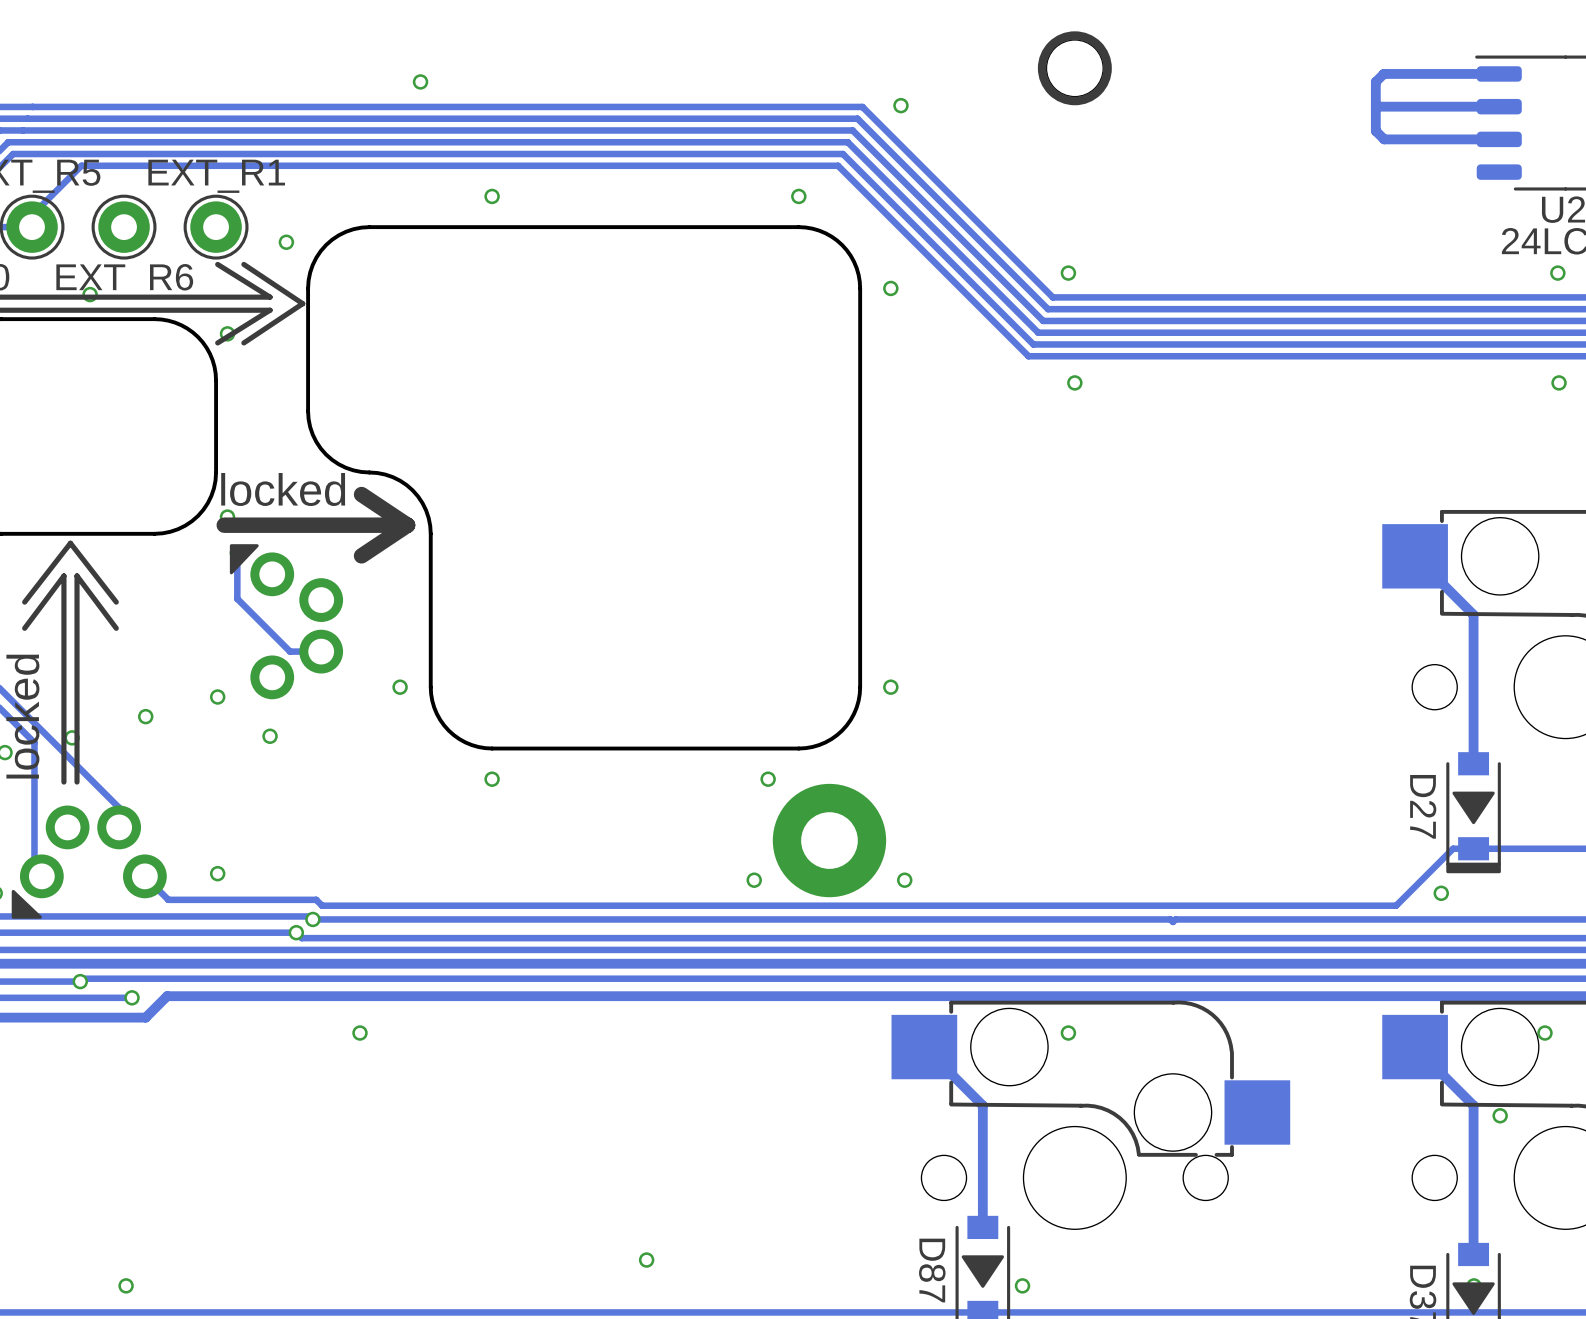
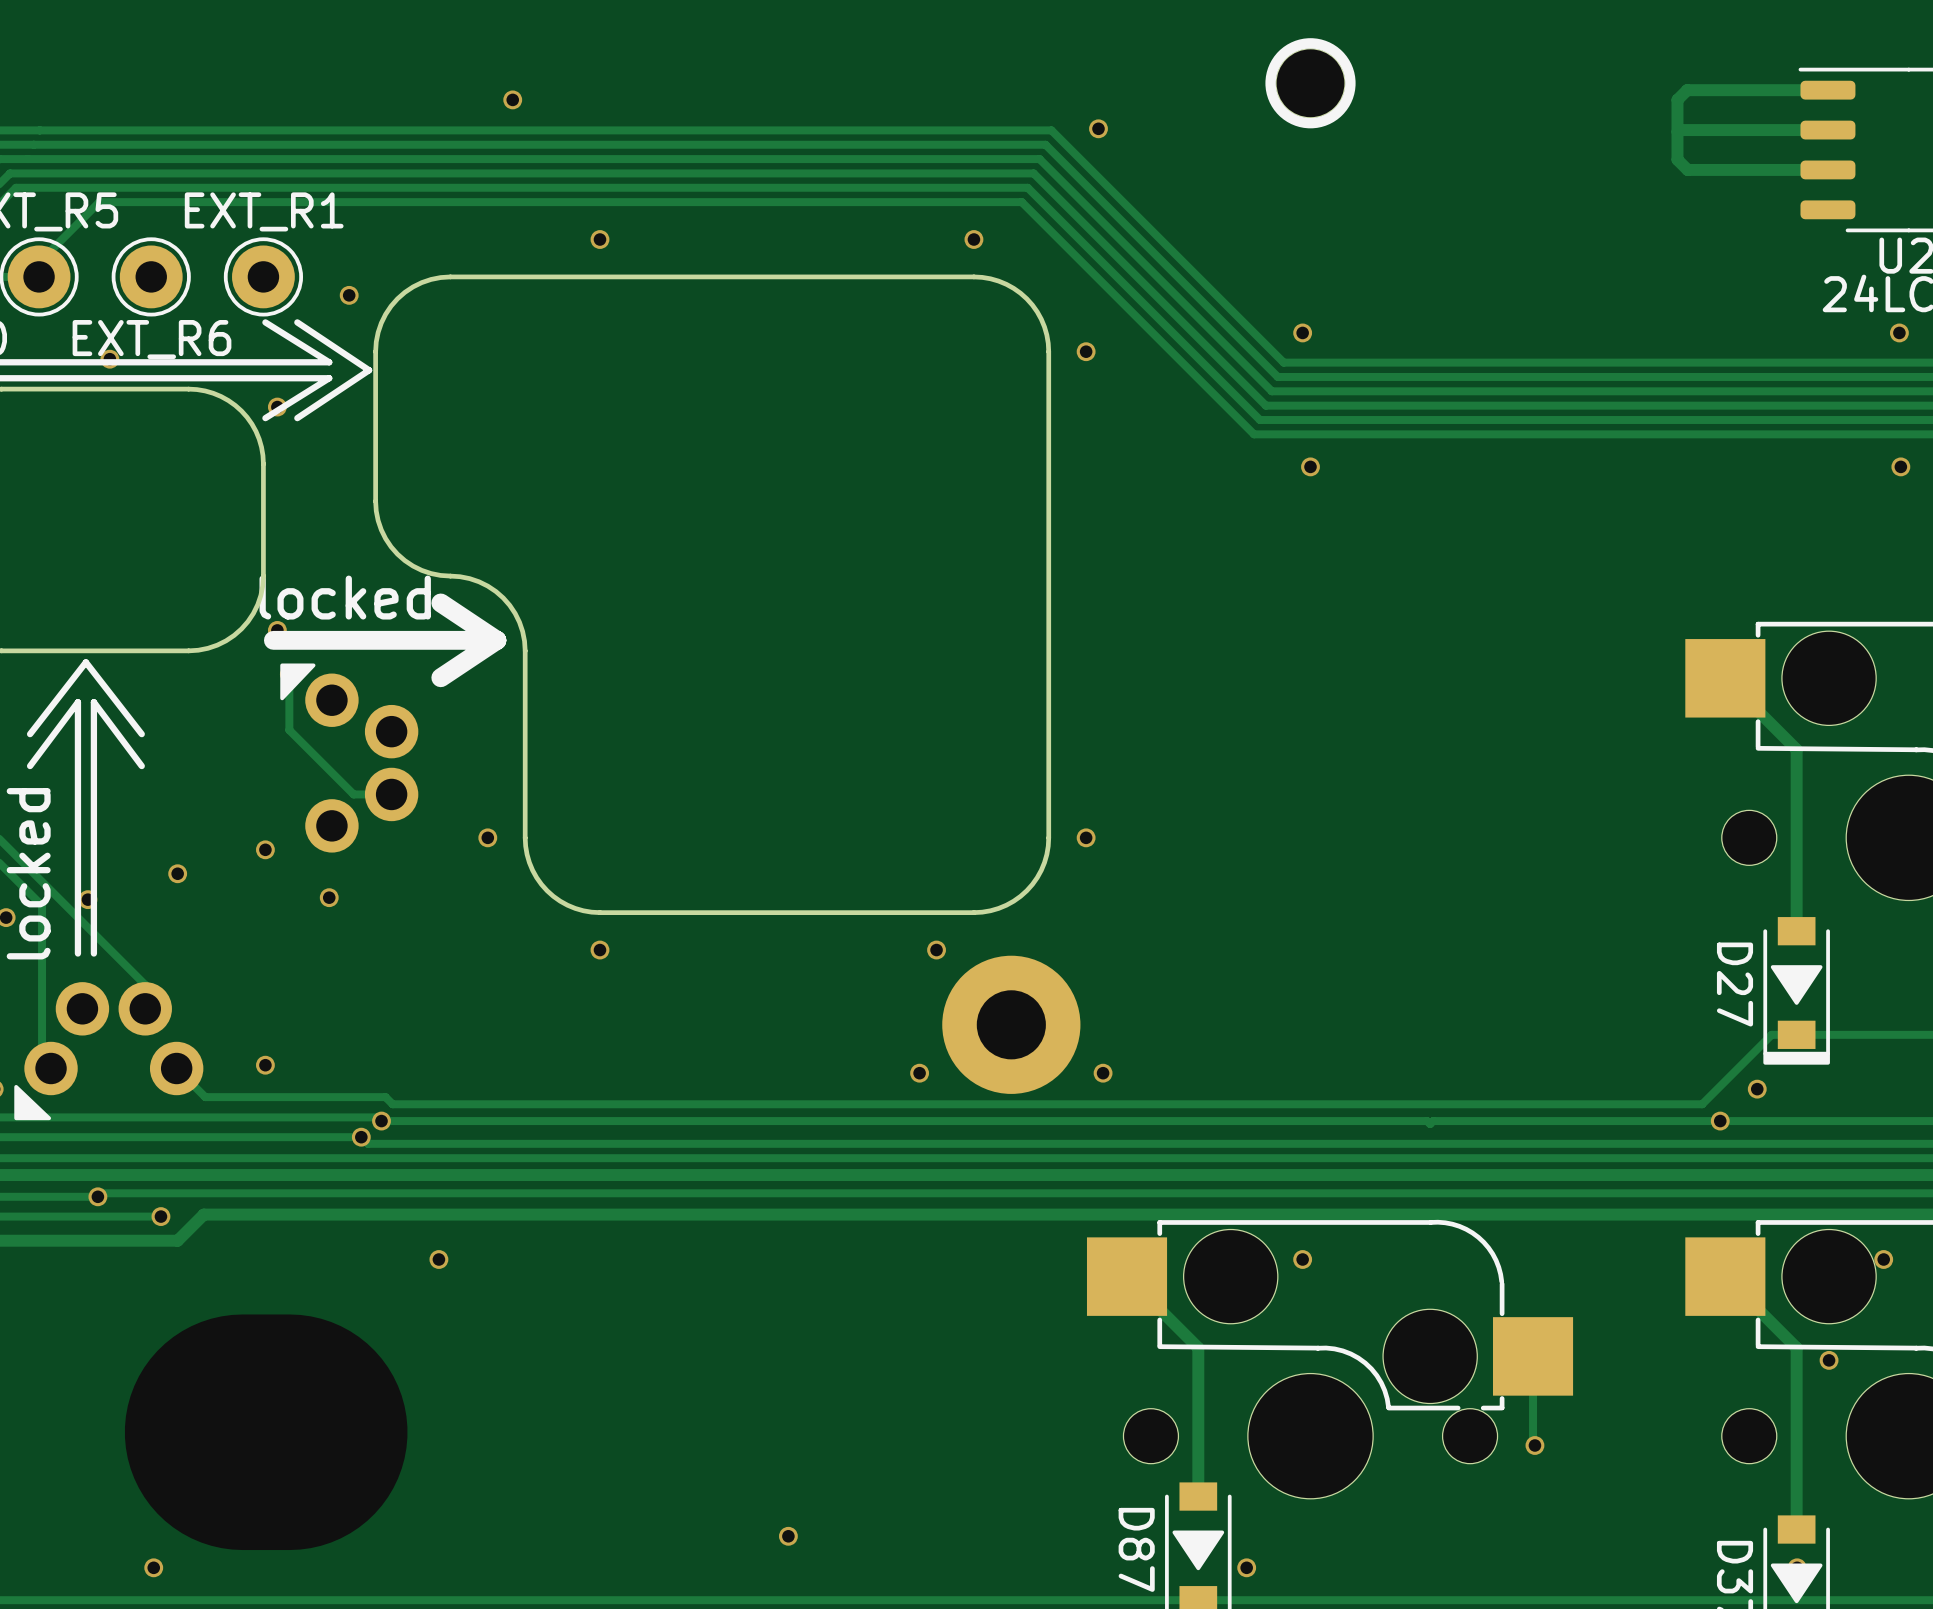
via: none -> (1720, 1121)
track: none -> (1533, 1356) (1533, 1443) (1534, 1445)
via: none -> (1534, 1445)

